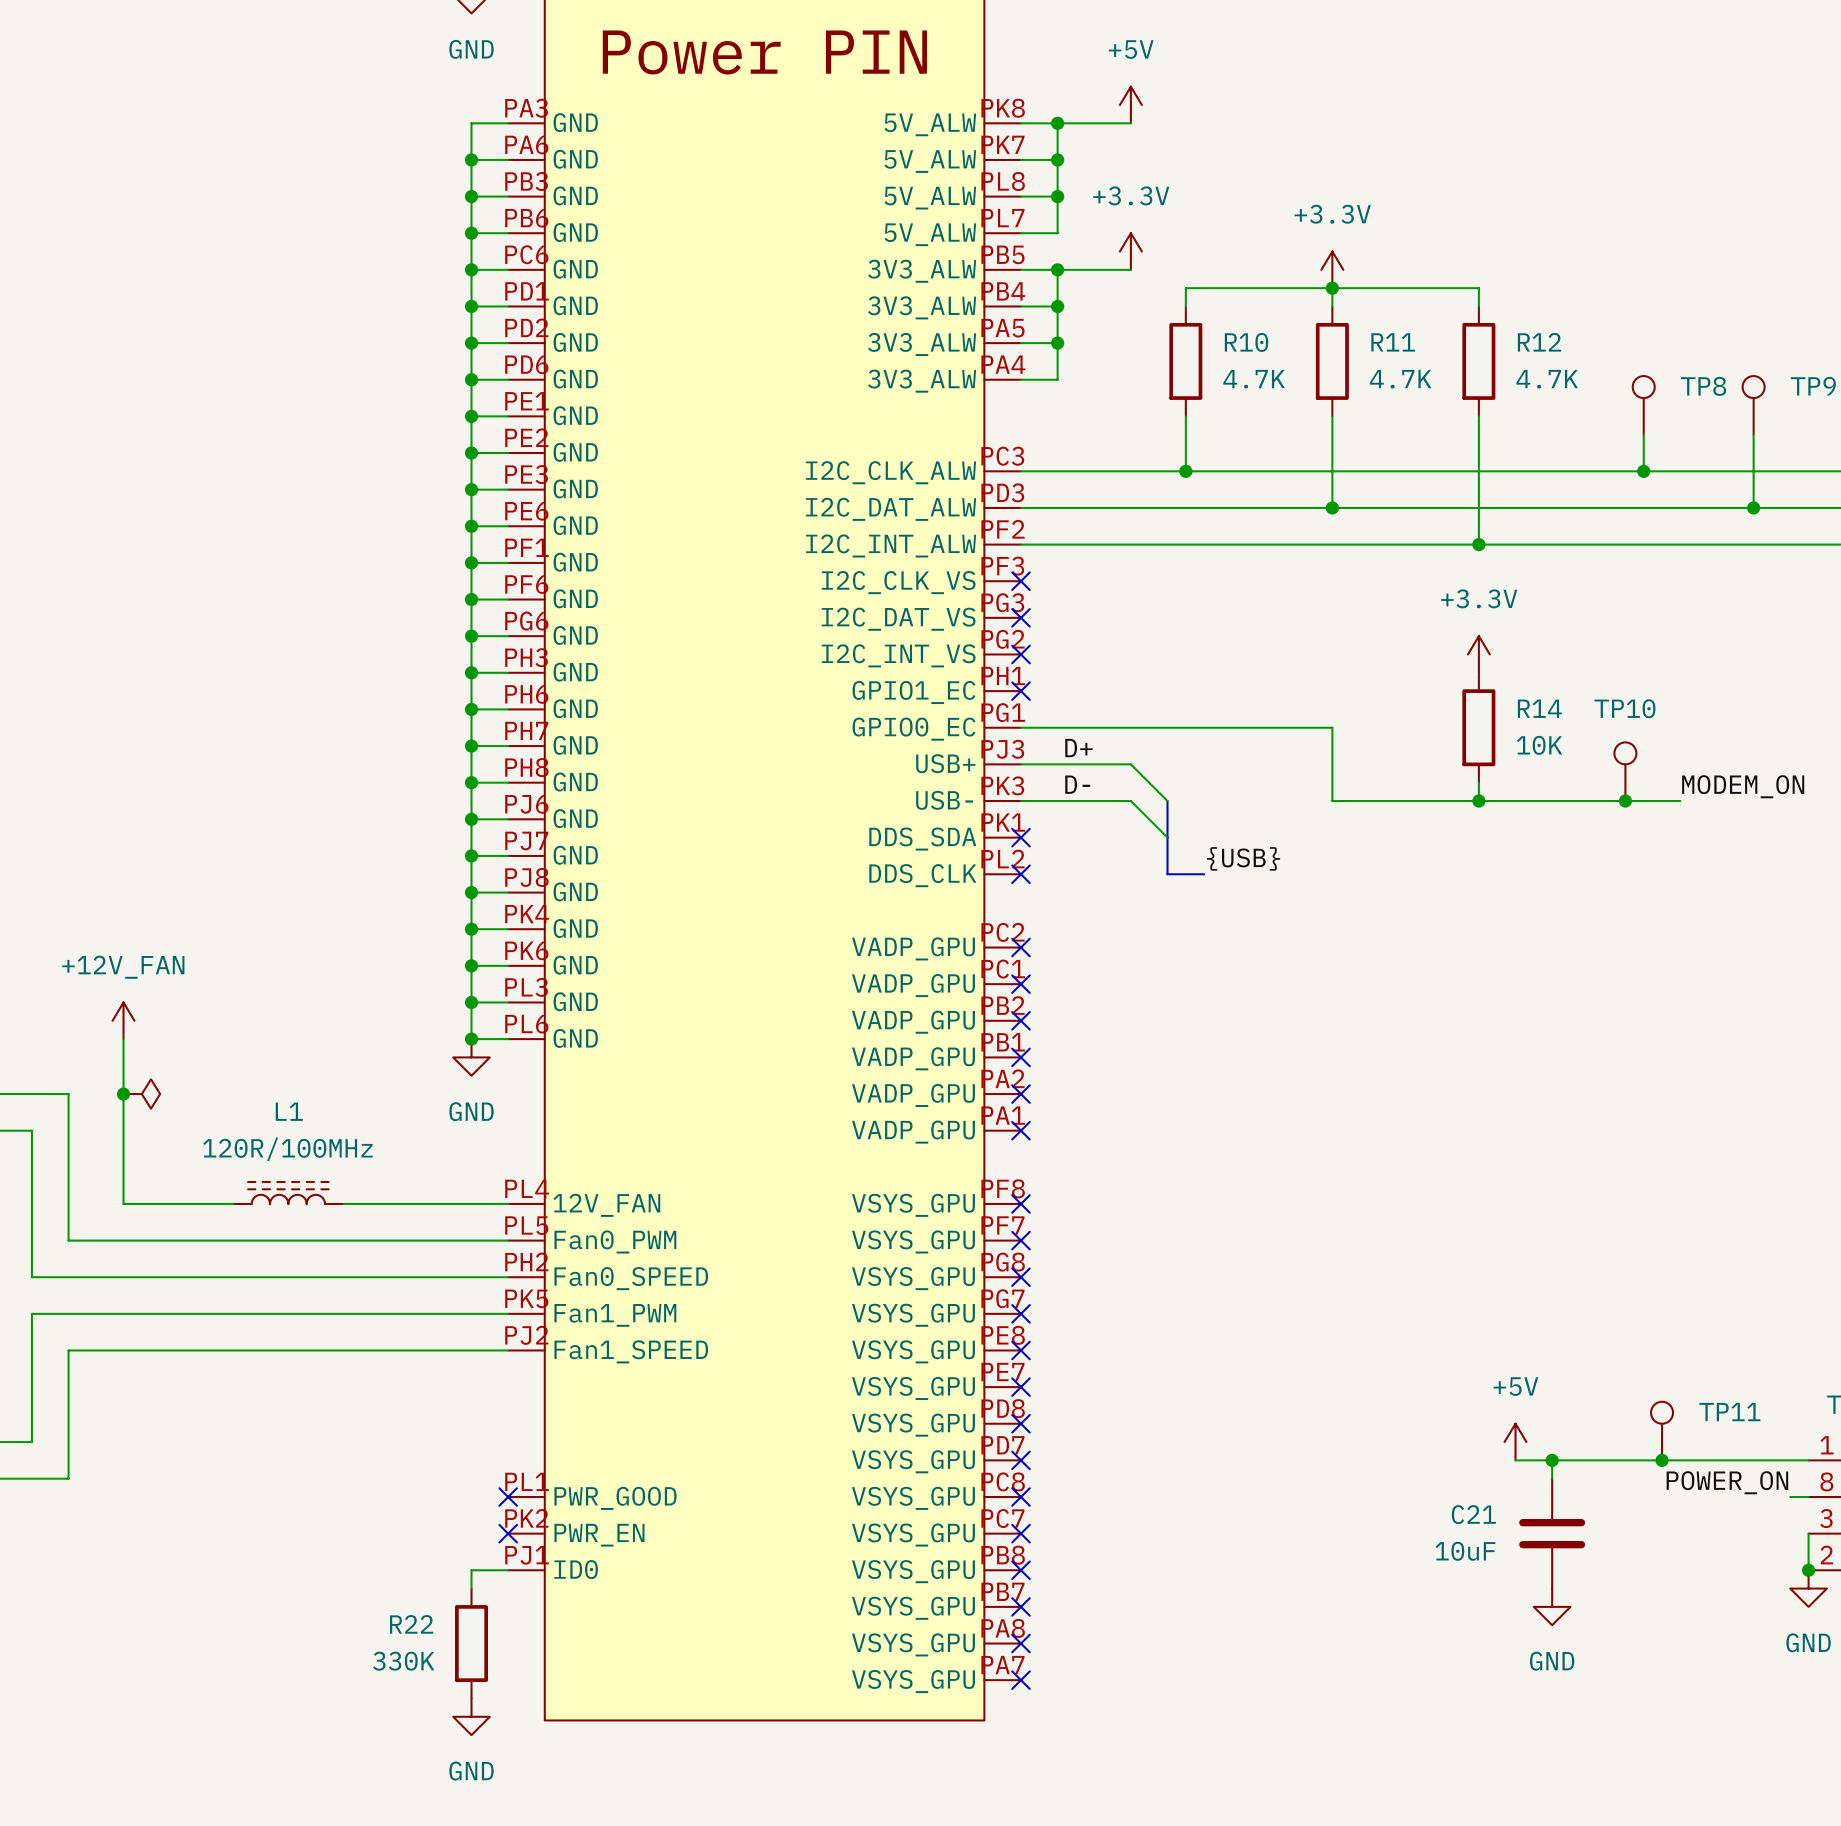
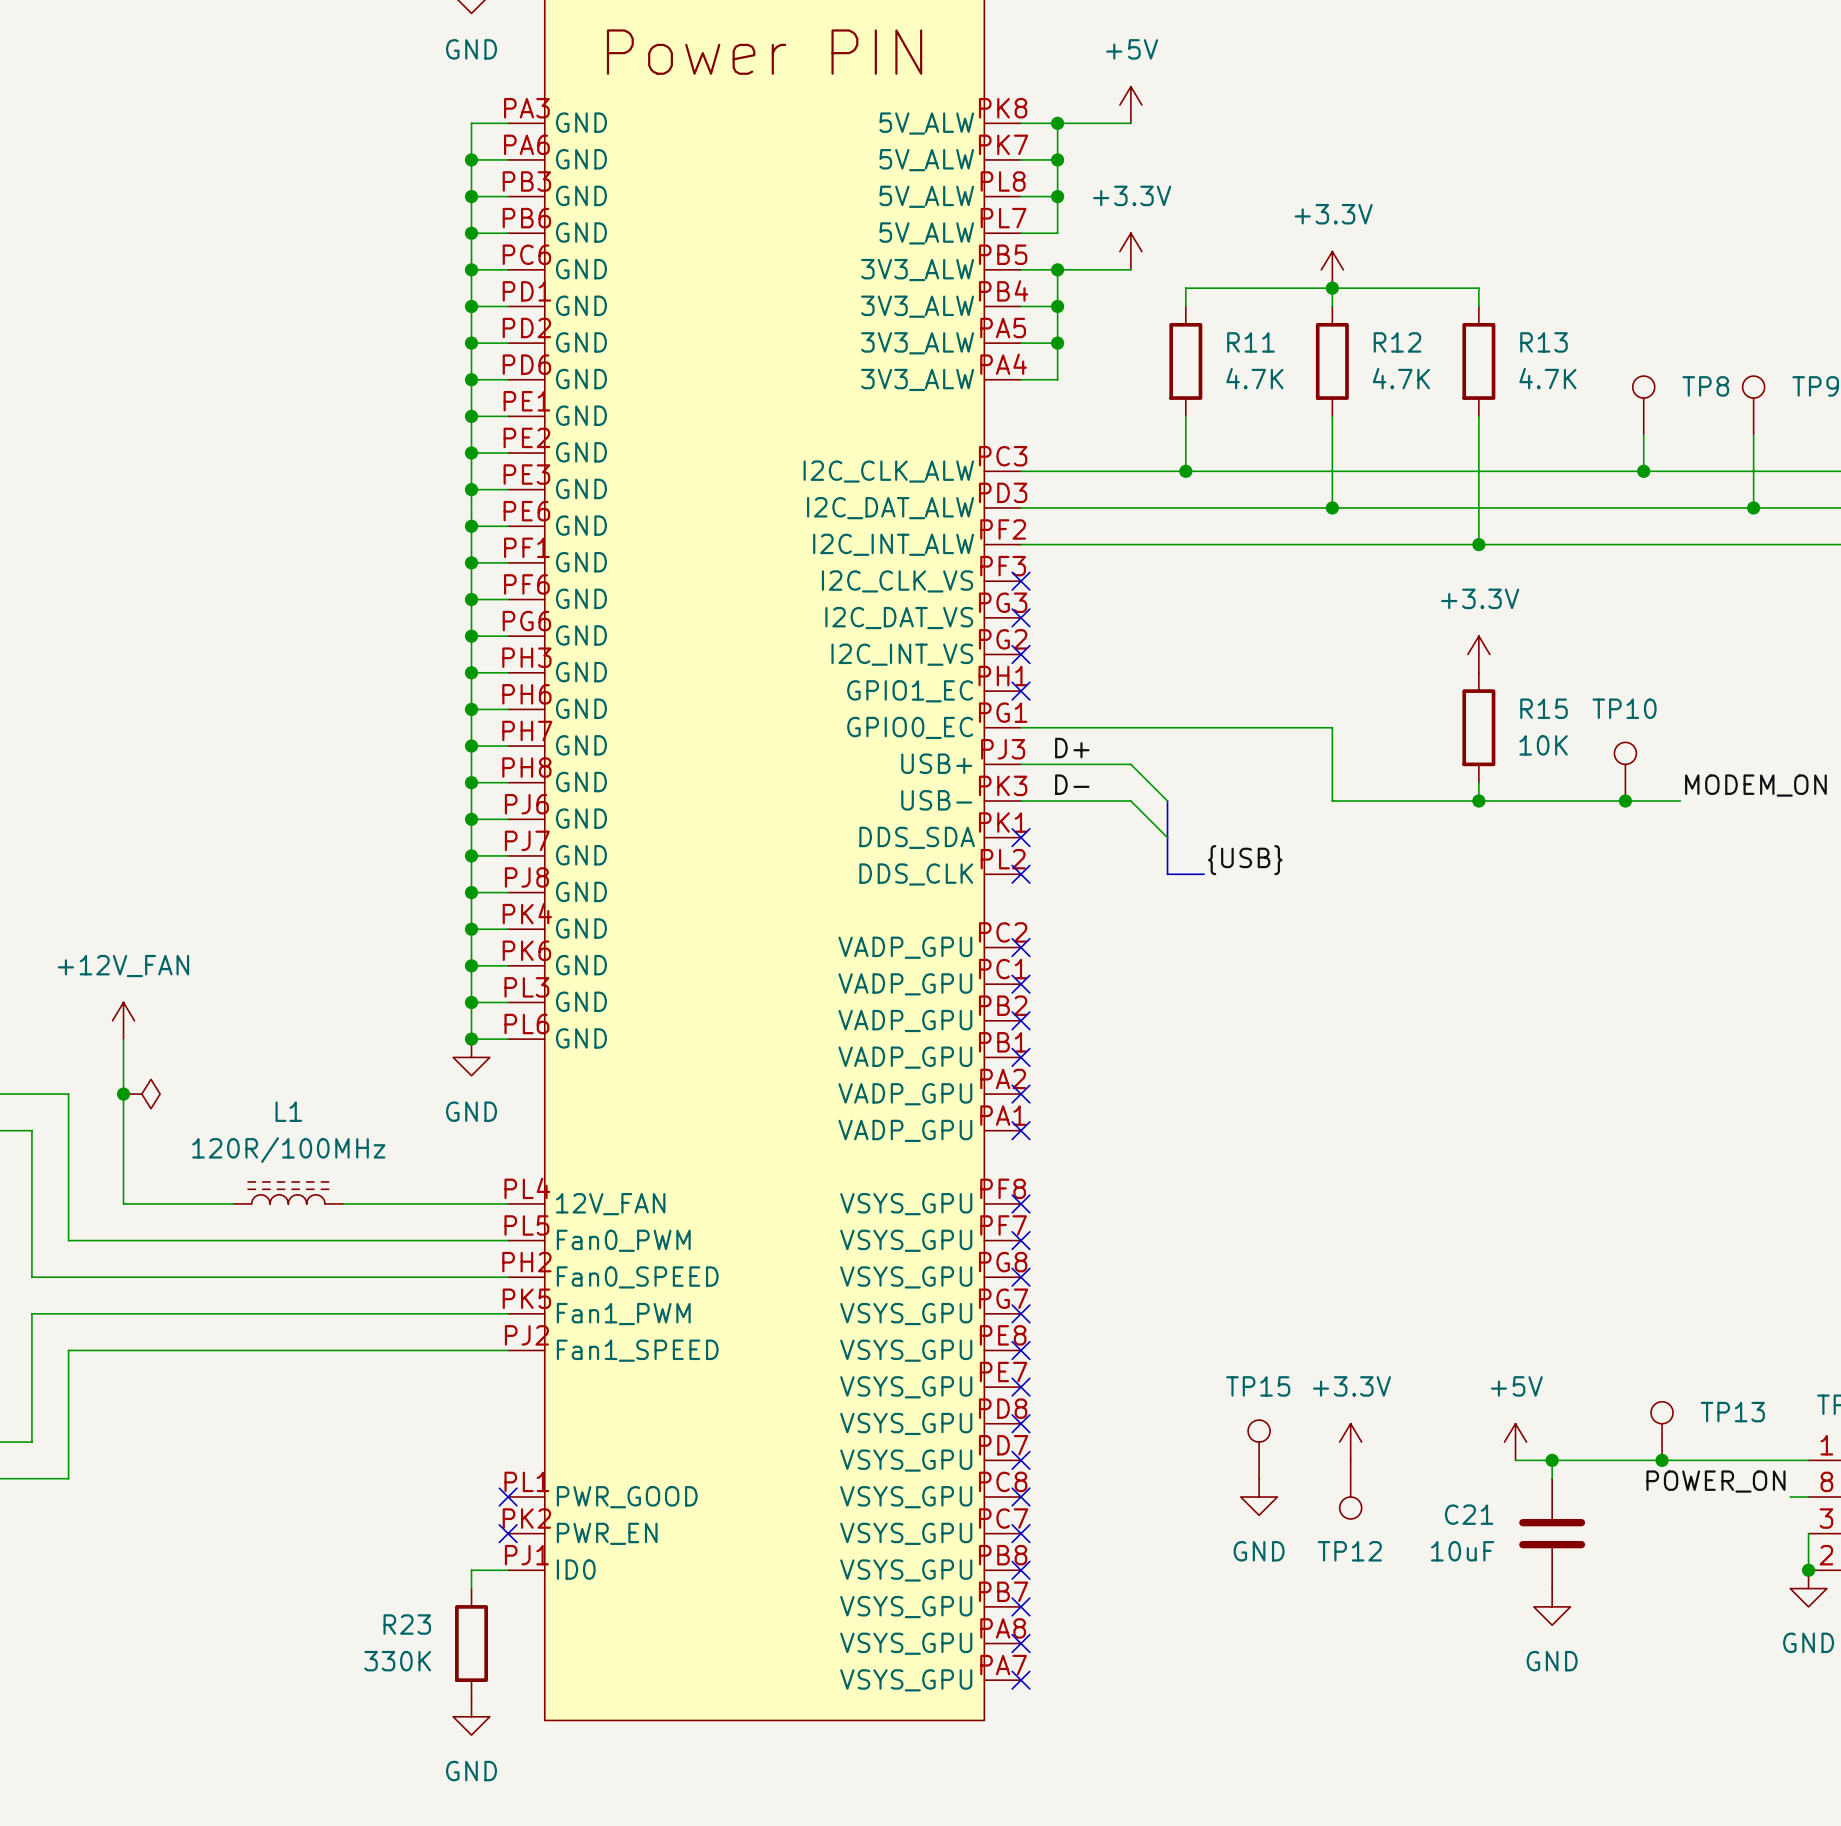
R10 name: R10 (1246, 342) -> R11 (1250, 342)
R11 name: R11 (1393, 342) -> R12 (1397, 342)
R12 name: R12 (1539, 342) -> R13 (1544, 342)
R14 name: R14 (1539, 708) -> R15 (1544, 708)
TP11 name: TP11 (1729, 1412) -> TP13 (1732, 1412)
power symbol: none -> +3.3V (1350, 1442)
TP15: none -> (1259, 1449)
TP12: none -> (1350, 1489)
power symbol: none -> GND (1259, 1497)
R22 name: R22 (411, 1624) -> R23 (407, 1624)

